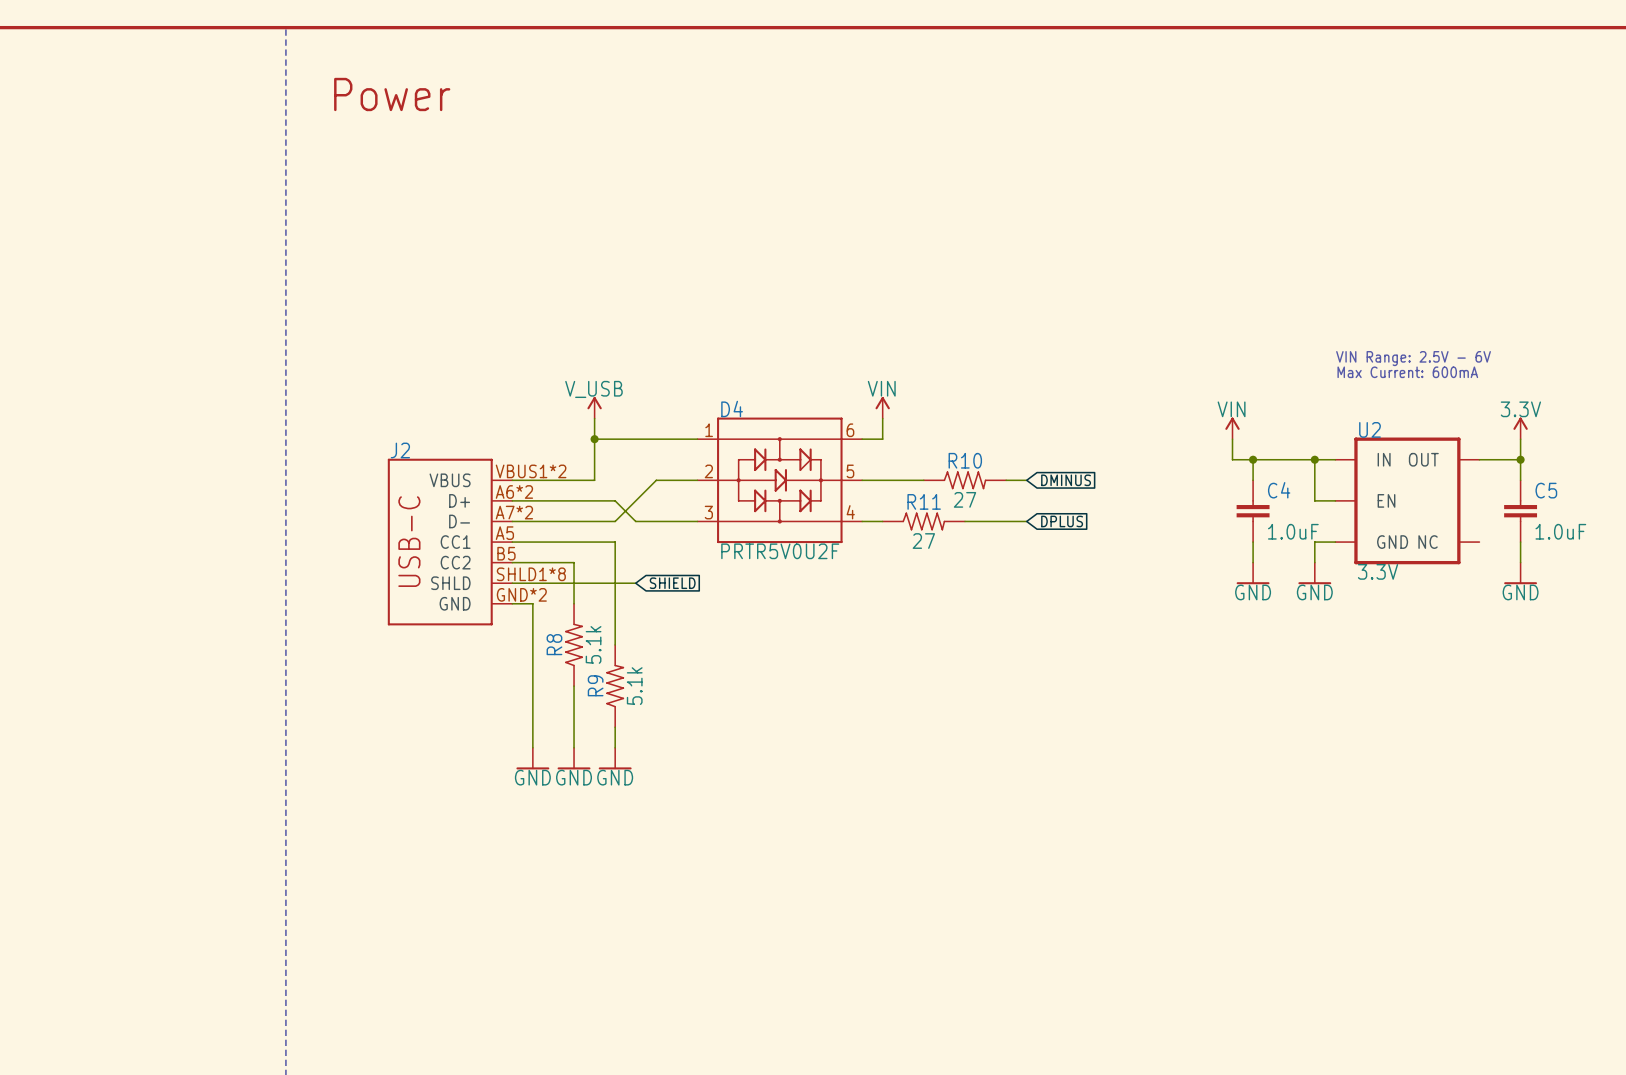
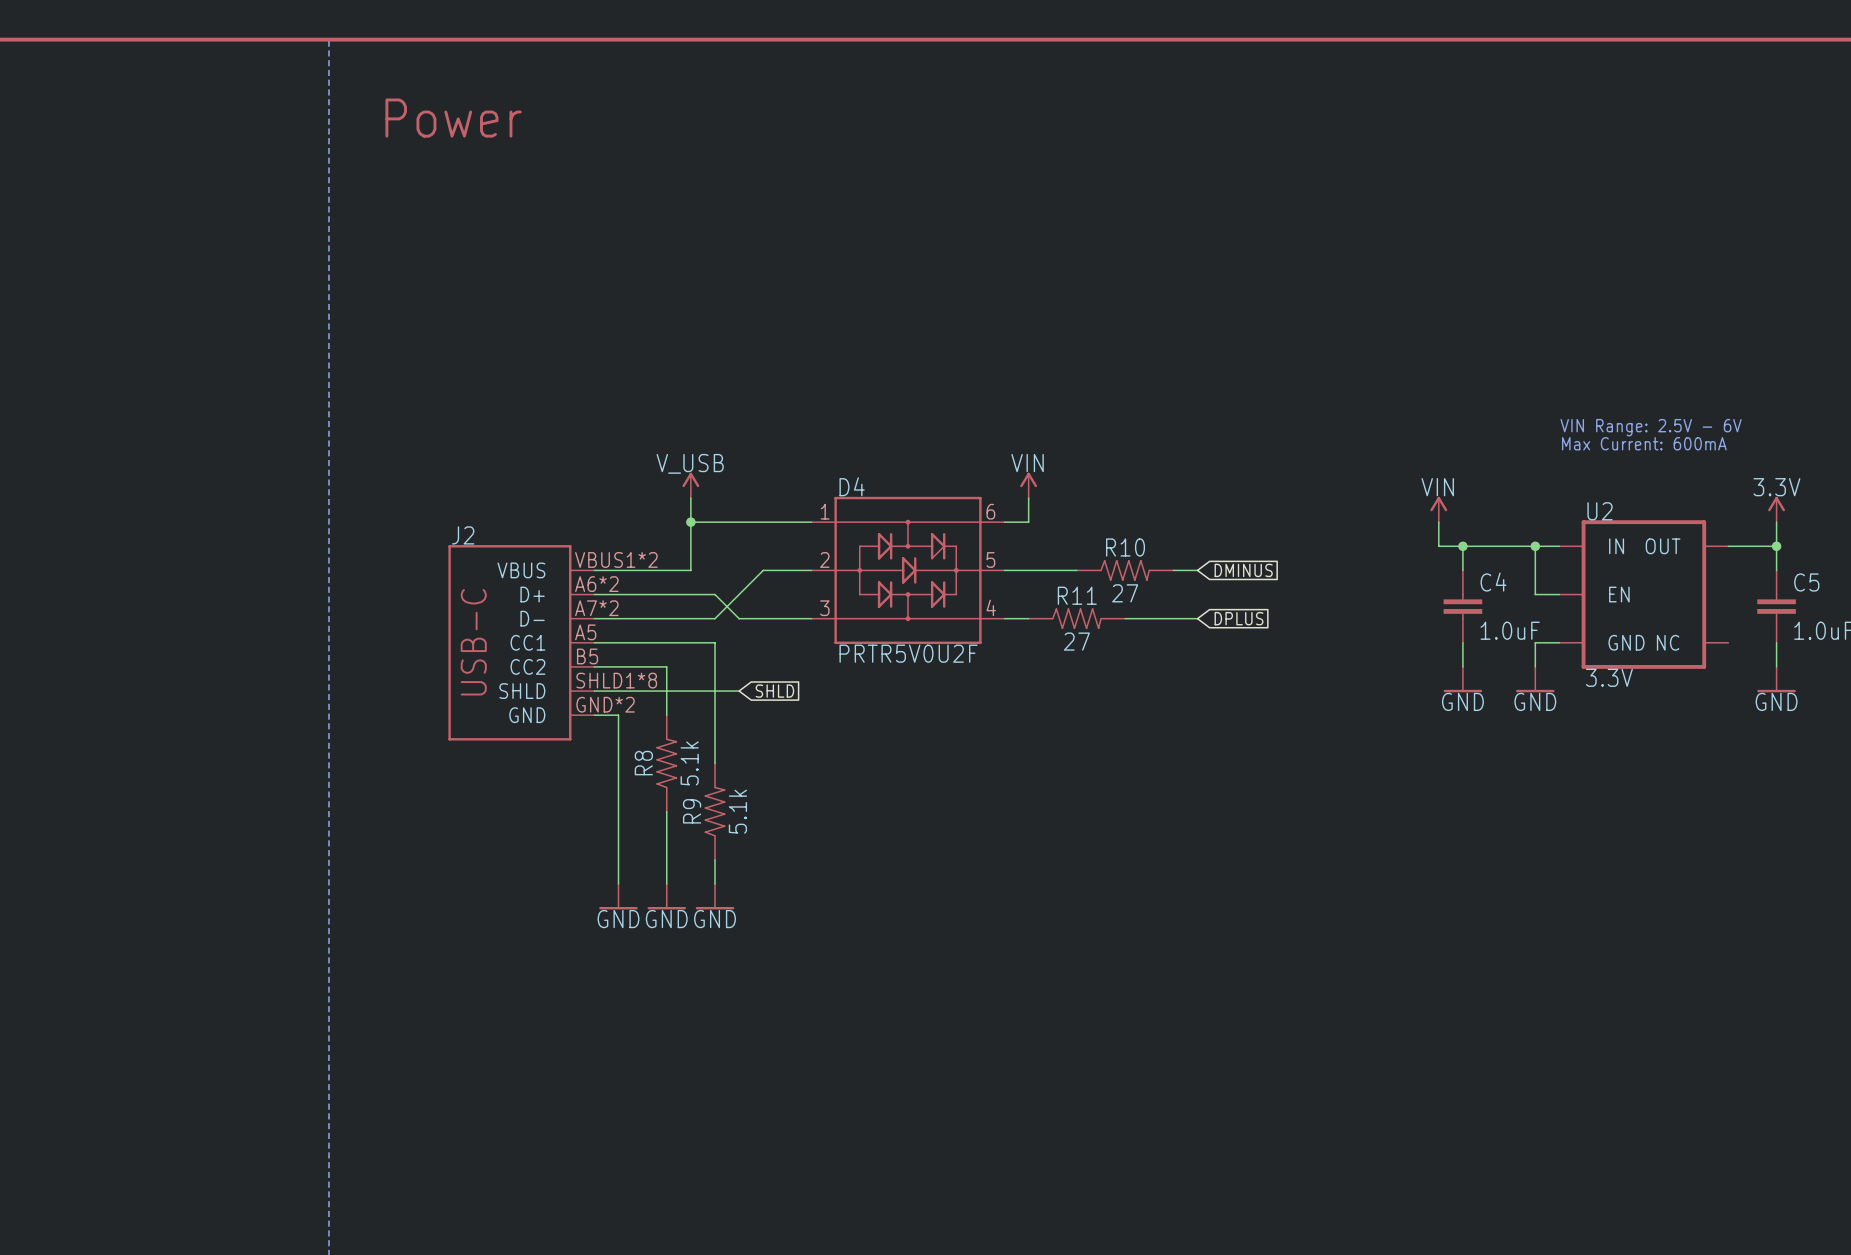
global label: SHIELD (672, 583) -> SHLD (774, 691)

